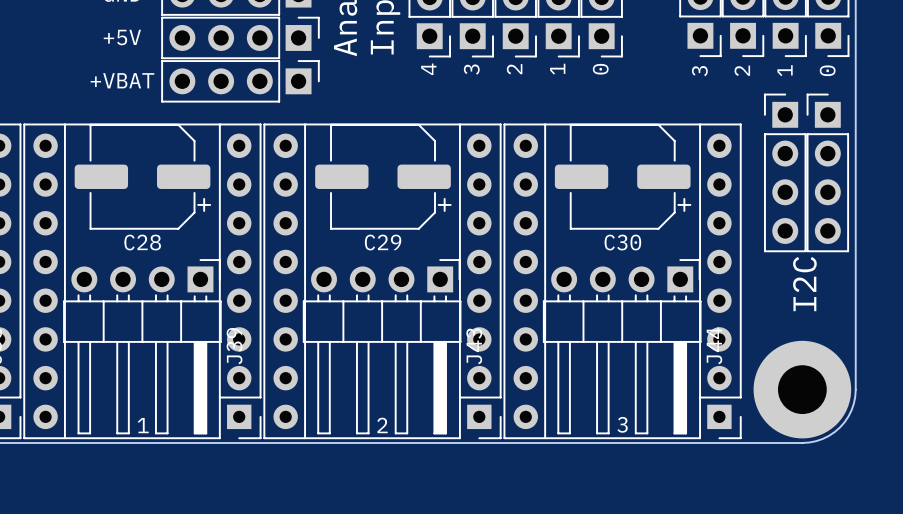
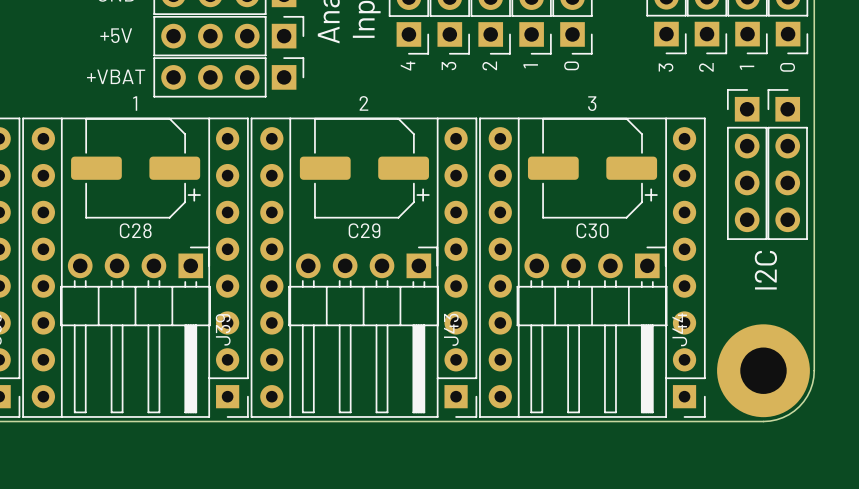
part value position: 3 (622, 424) -> 3 (592, 103)
part value position: 1 (143, 425) -> 1 (135, 103)
part value position: 2 (382, 425) -> 2 (363, 103)

